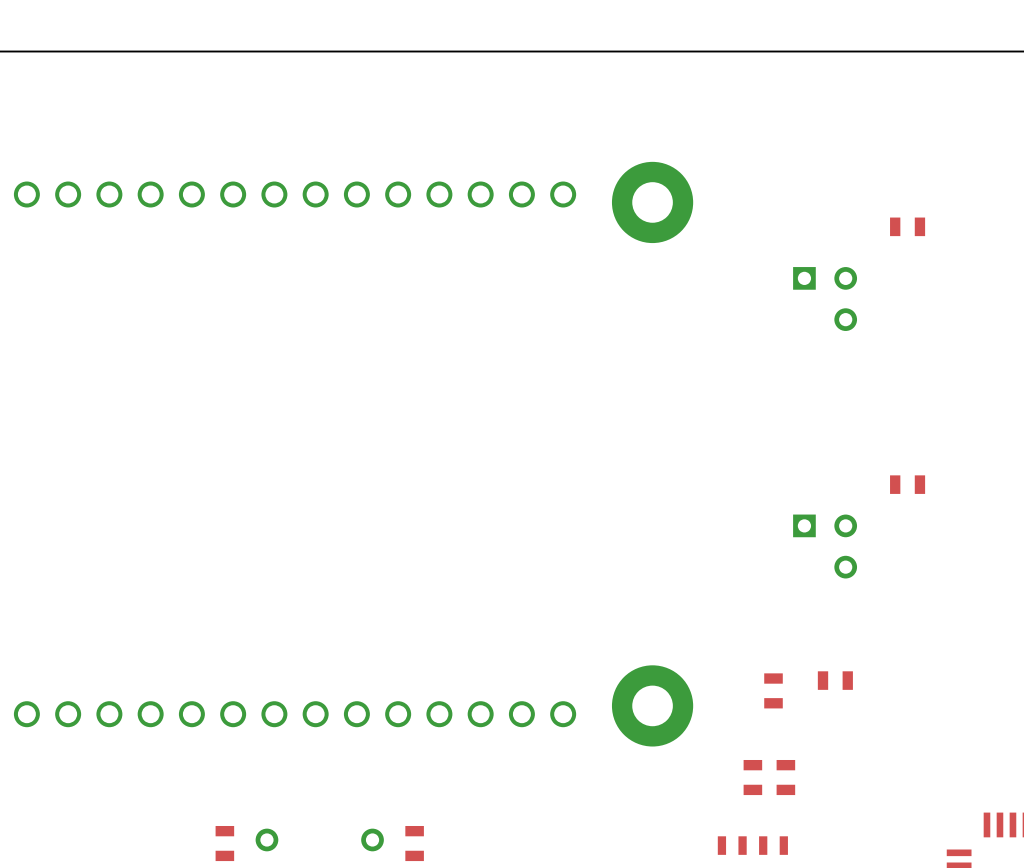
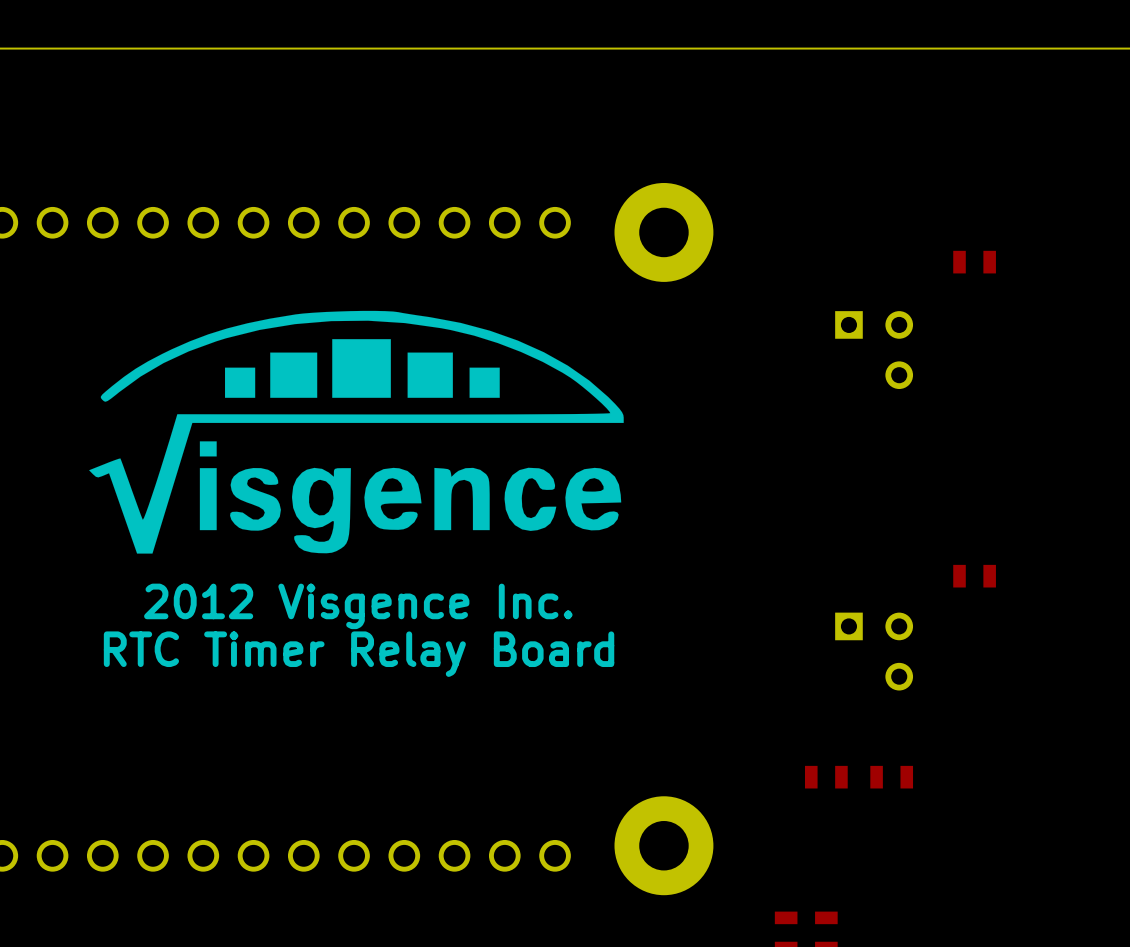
drawing: none -> [89, 310, 624, 554]
text: none -> 2012 Visgence Inc. (358, 606)
text: none -> RTC Timer Relay Board (359, 654)
part: none -> (826, 777)
part: none -> (891, 777)
part: (835, 680) -> none
part: (773, 690) -> none

